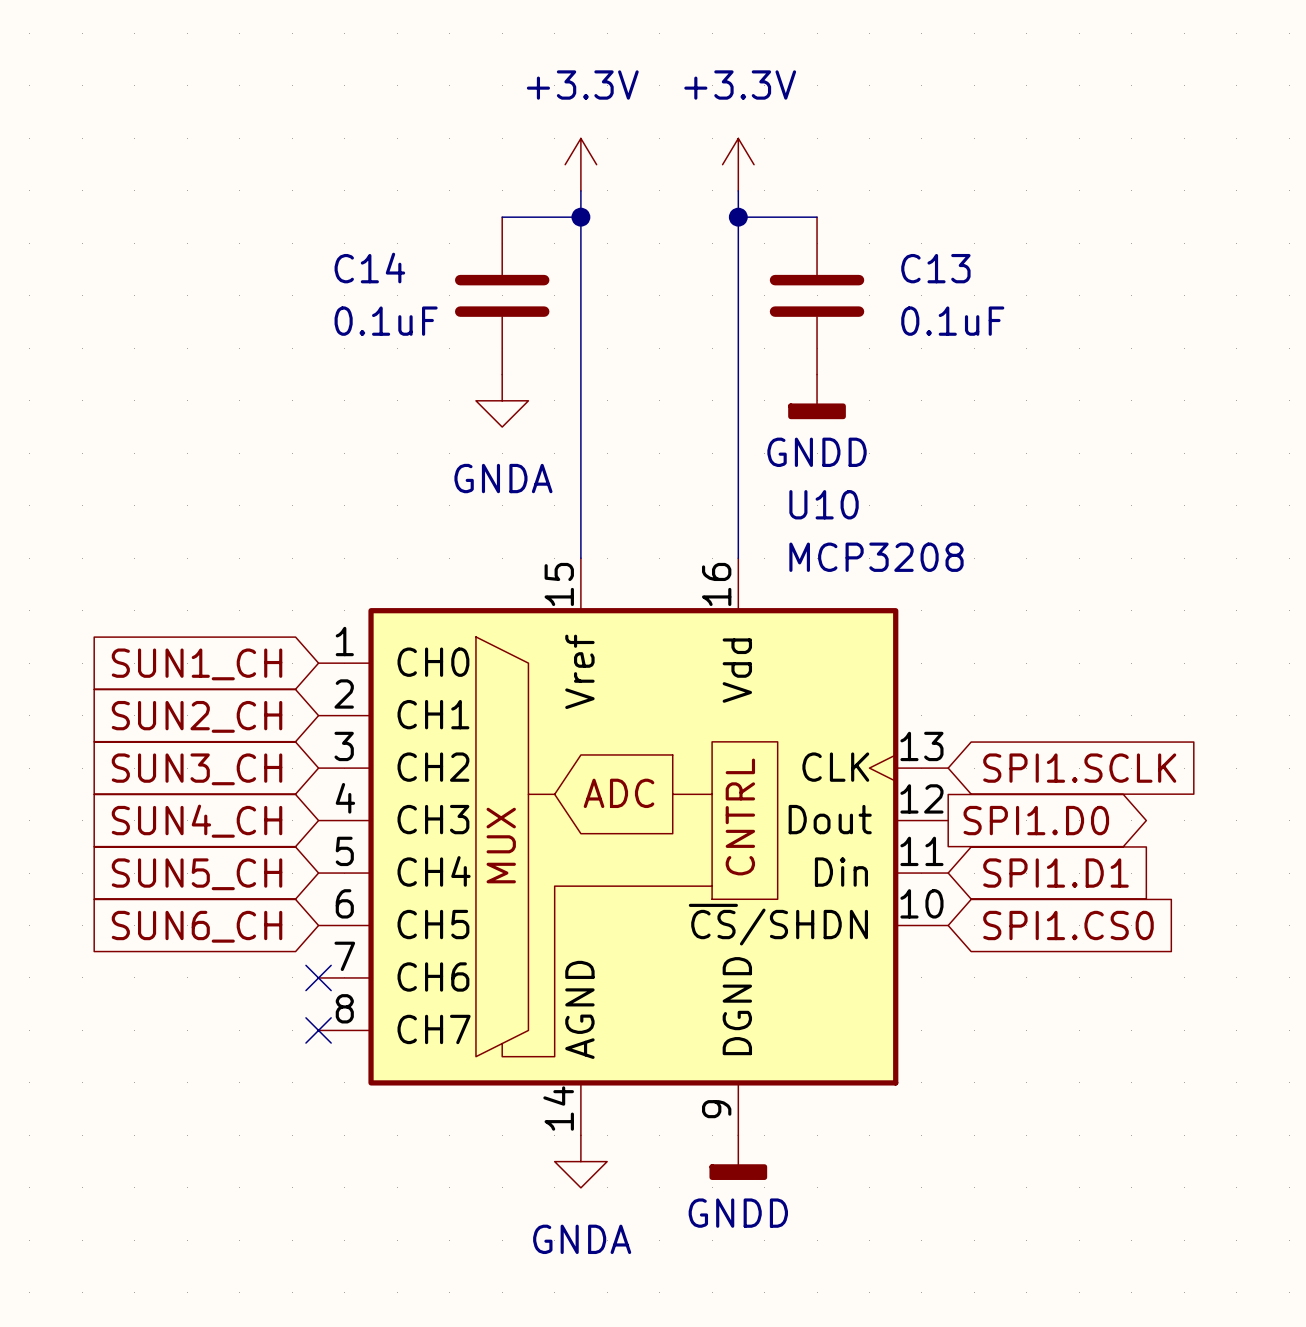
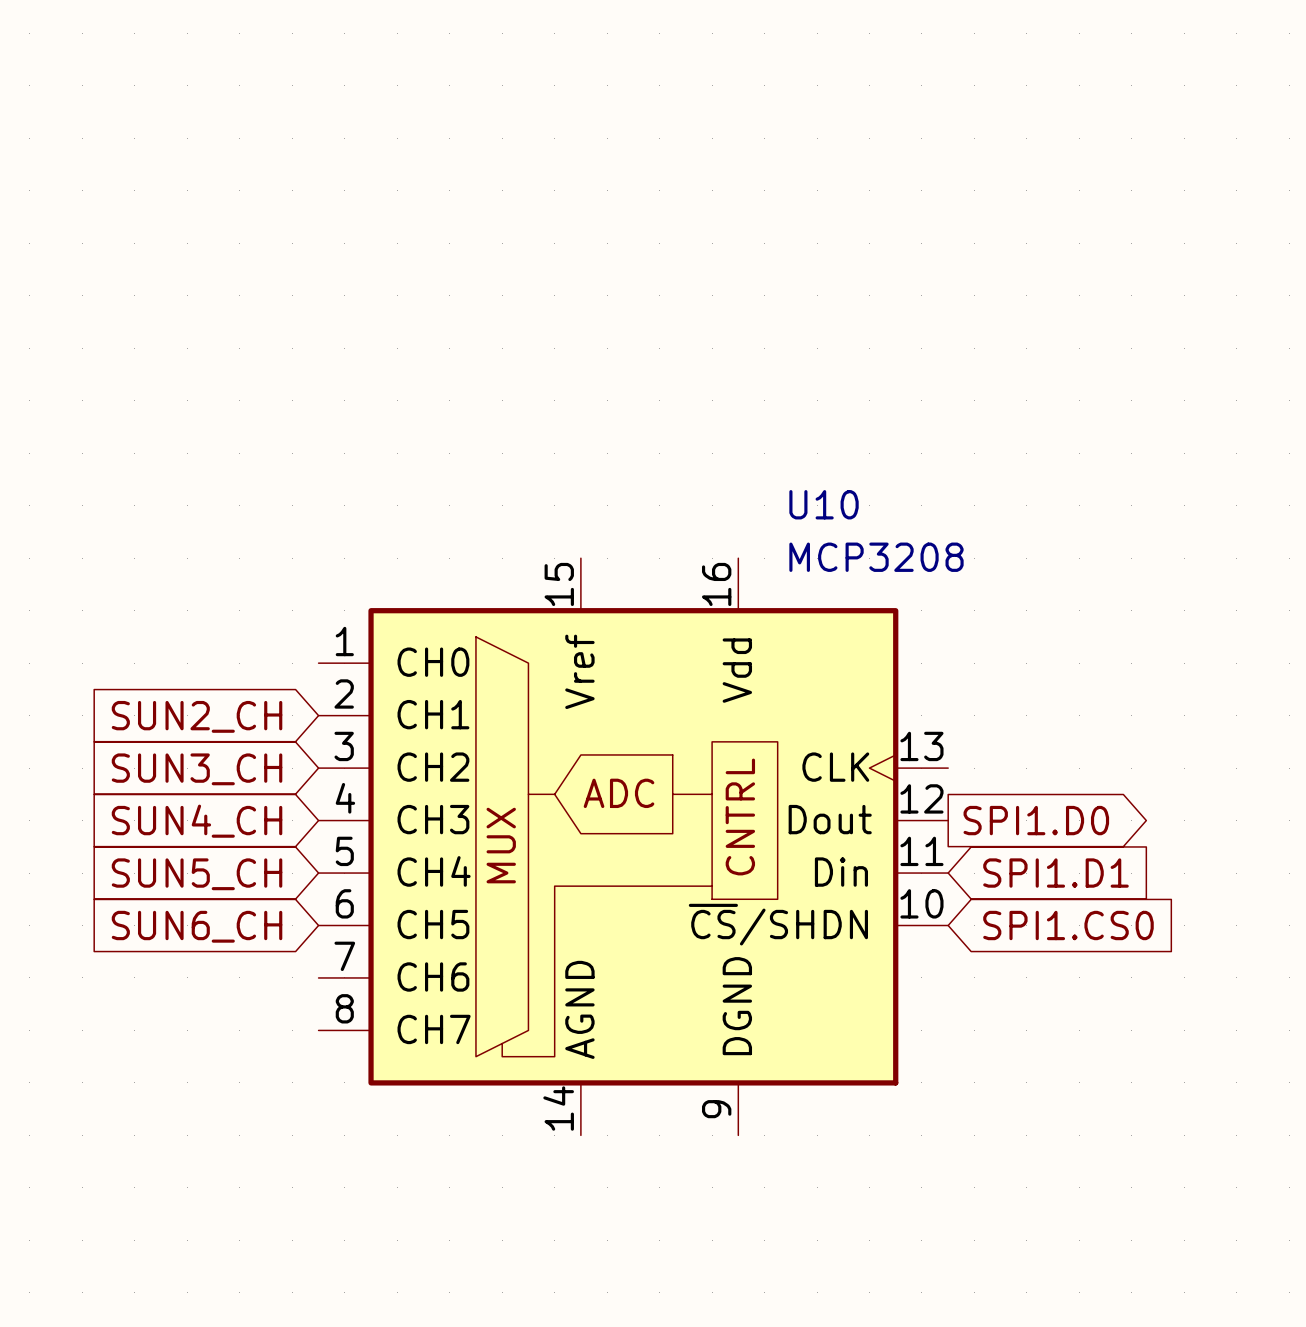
power symbol: +3.3V (580, 164) -> none
power symbol: +3.3V (738, 164) -> none
wire: (580, 190) (580, 558) -> none
wire: (738, 190) (738, 558) -> none
wire: (502, 217) (580, 217) -> none
junction: (580, 217) -> none
wire: (738, 217) (817, 217) -> none
junction: (738, 217) -> none
C14: 0.1uF (502, 295) -> none
C13: 0.1uF (817, 295) -> none
power symbol: GNDD (817, 396) -> none
power symbol: GNDA (502, 400) -> none
global label: SUN1_CH (197, 664) -> none
global label: SPI1.SCLK (1079, 768) -> none
no-connect mark: (318, 977) -> none
no-connect mark: (318, 1030) -> none
power symbol: GNDD (738, 1157) -> none
power symbol: GNDA (580, 1161) -> none

